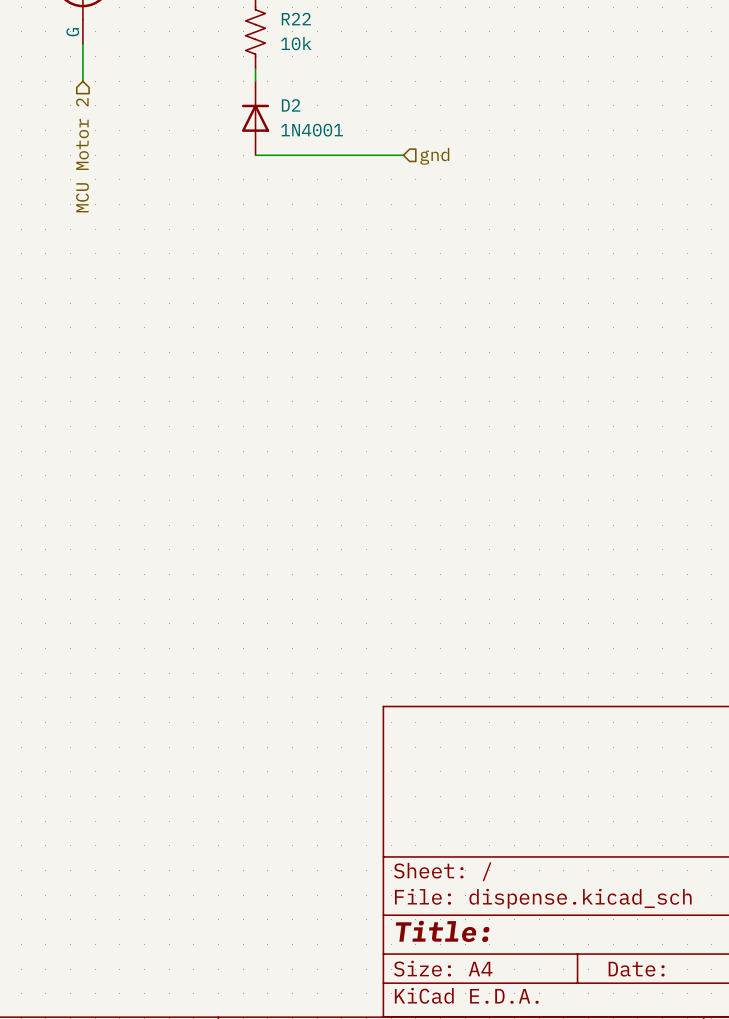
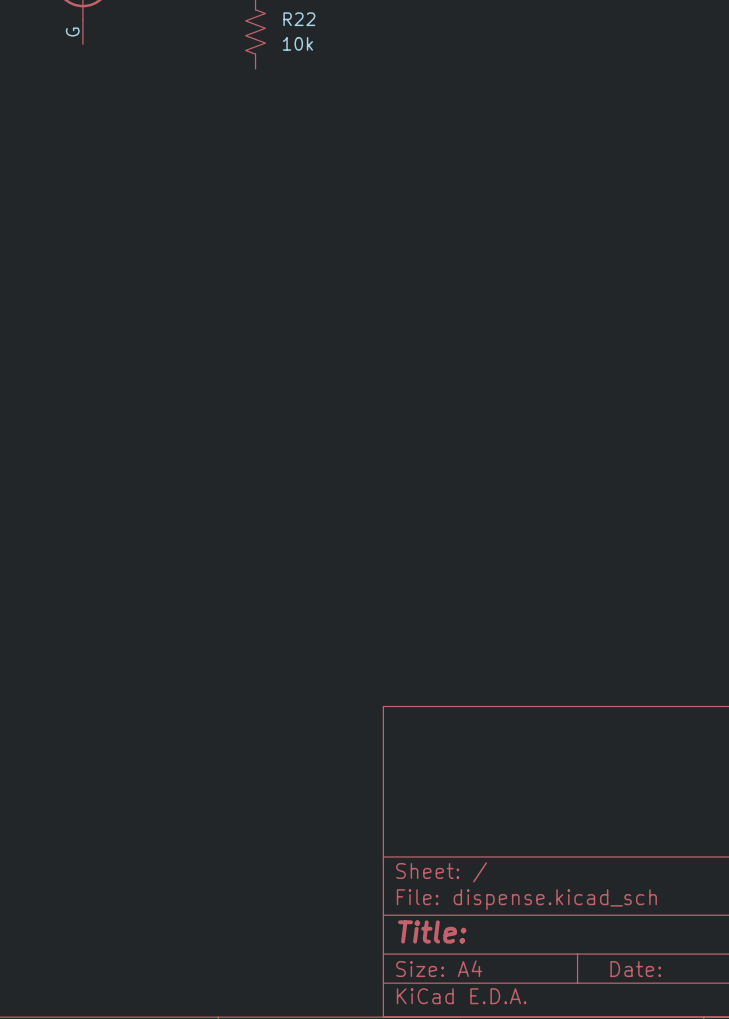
wire: (82, 44) (82, 81) -> none
wire: (255, 68) (255, 81) -> none
D2: 1N4001 (255, 118) -> none
hierarchical label: MCU Motor 2 (82, 155) -> none
wire: (255, 155) (403, 155) -> none
hierarchical label: gnd (434, 156) -> none

